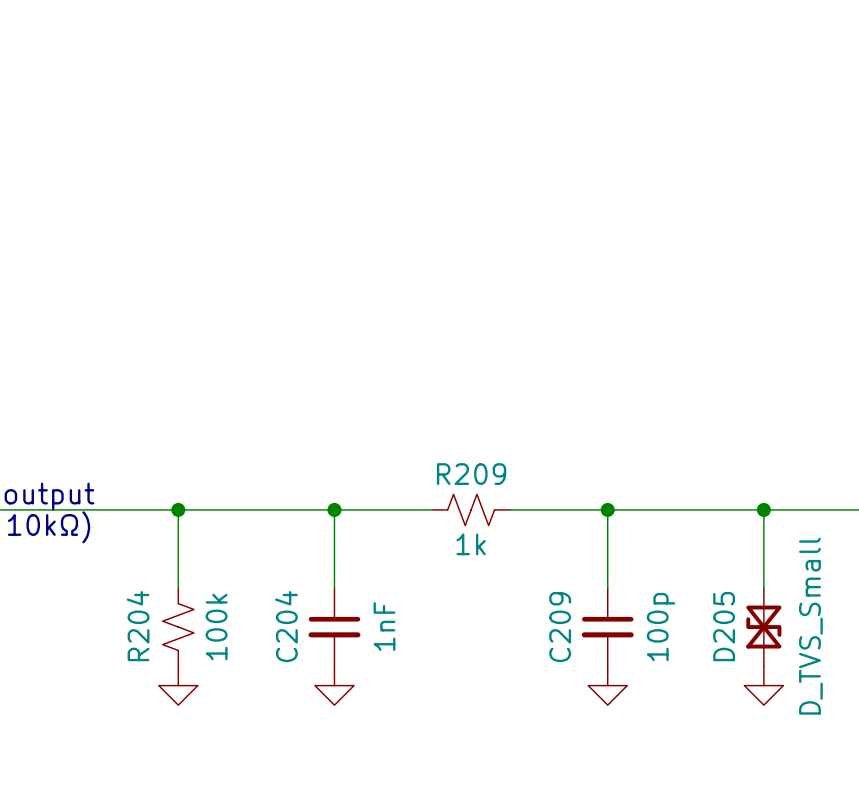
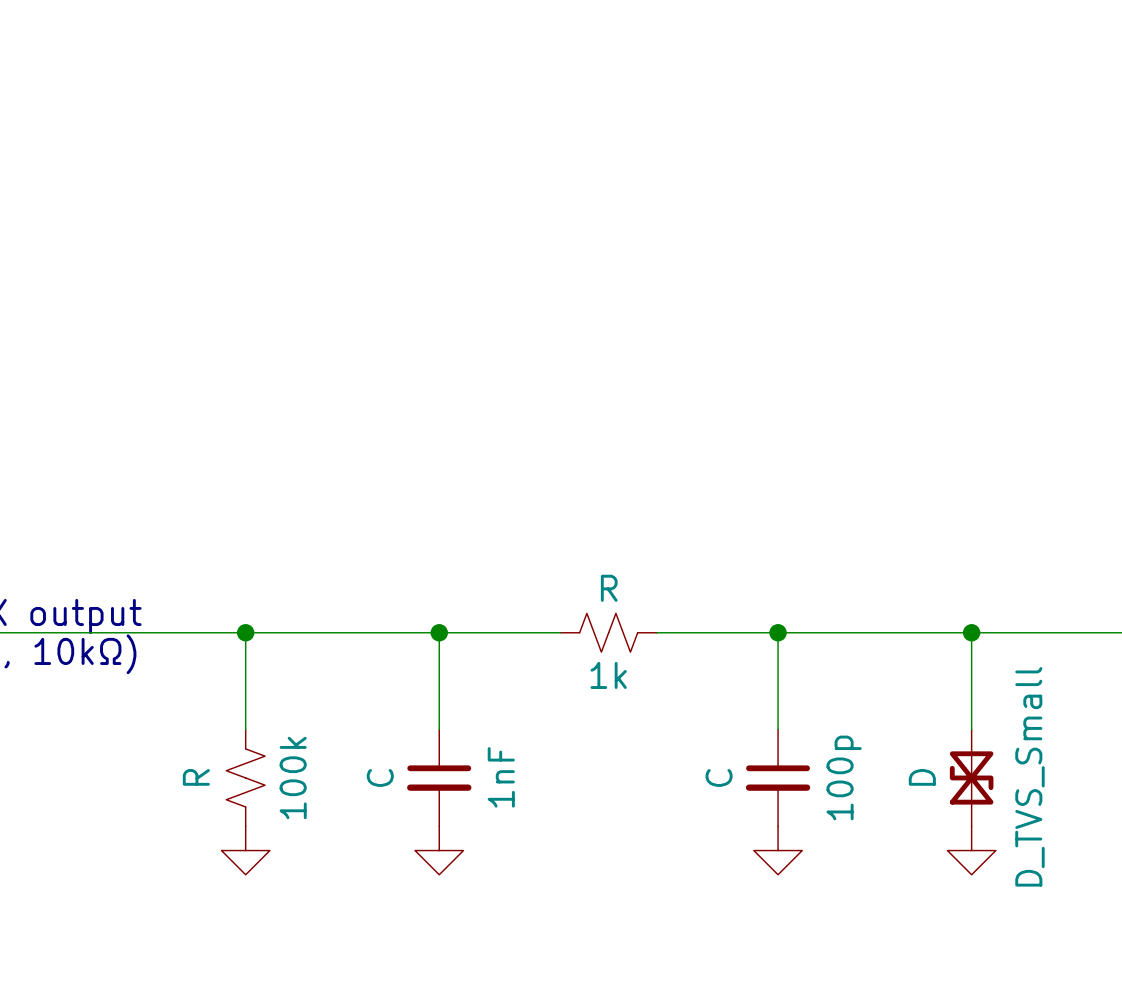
R209 name: R209 (471, 474) -> R (609, 588)
R204 name: R204 (138, 626) -> R (196, 777)
C204 name: C204 (286, 626) -> C (380, 777)
D205 name: D205 (724, 626) -> D (922, 777)
C209 name: C209 (560, 627) -> C (719, 777)

